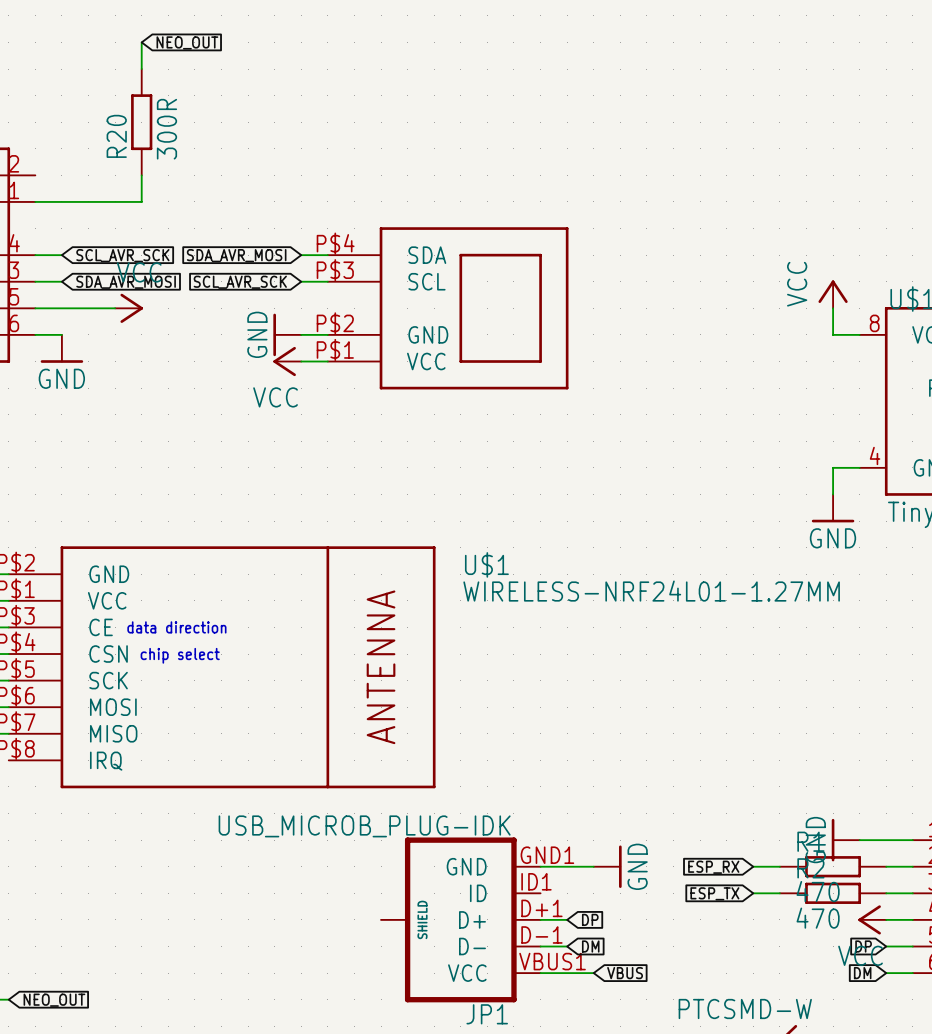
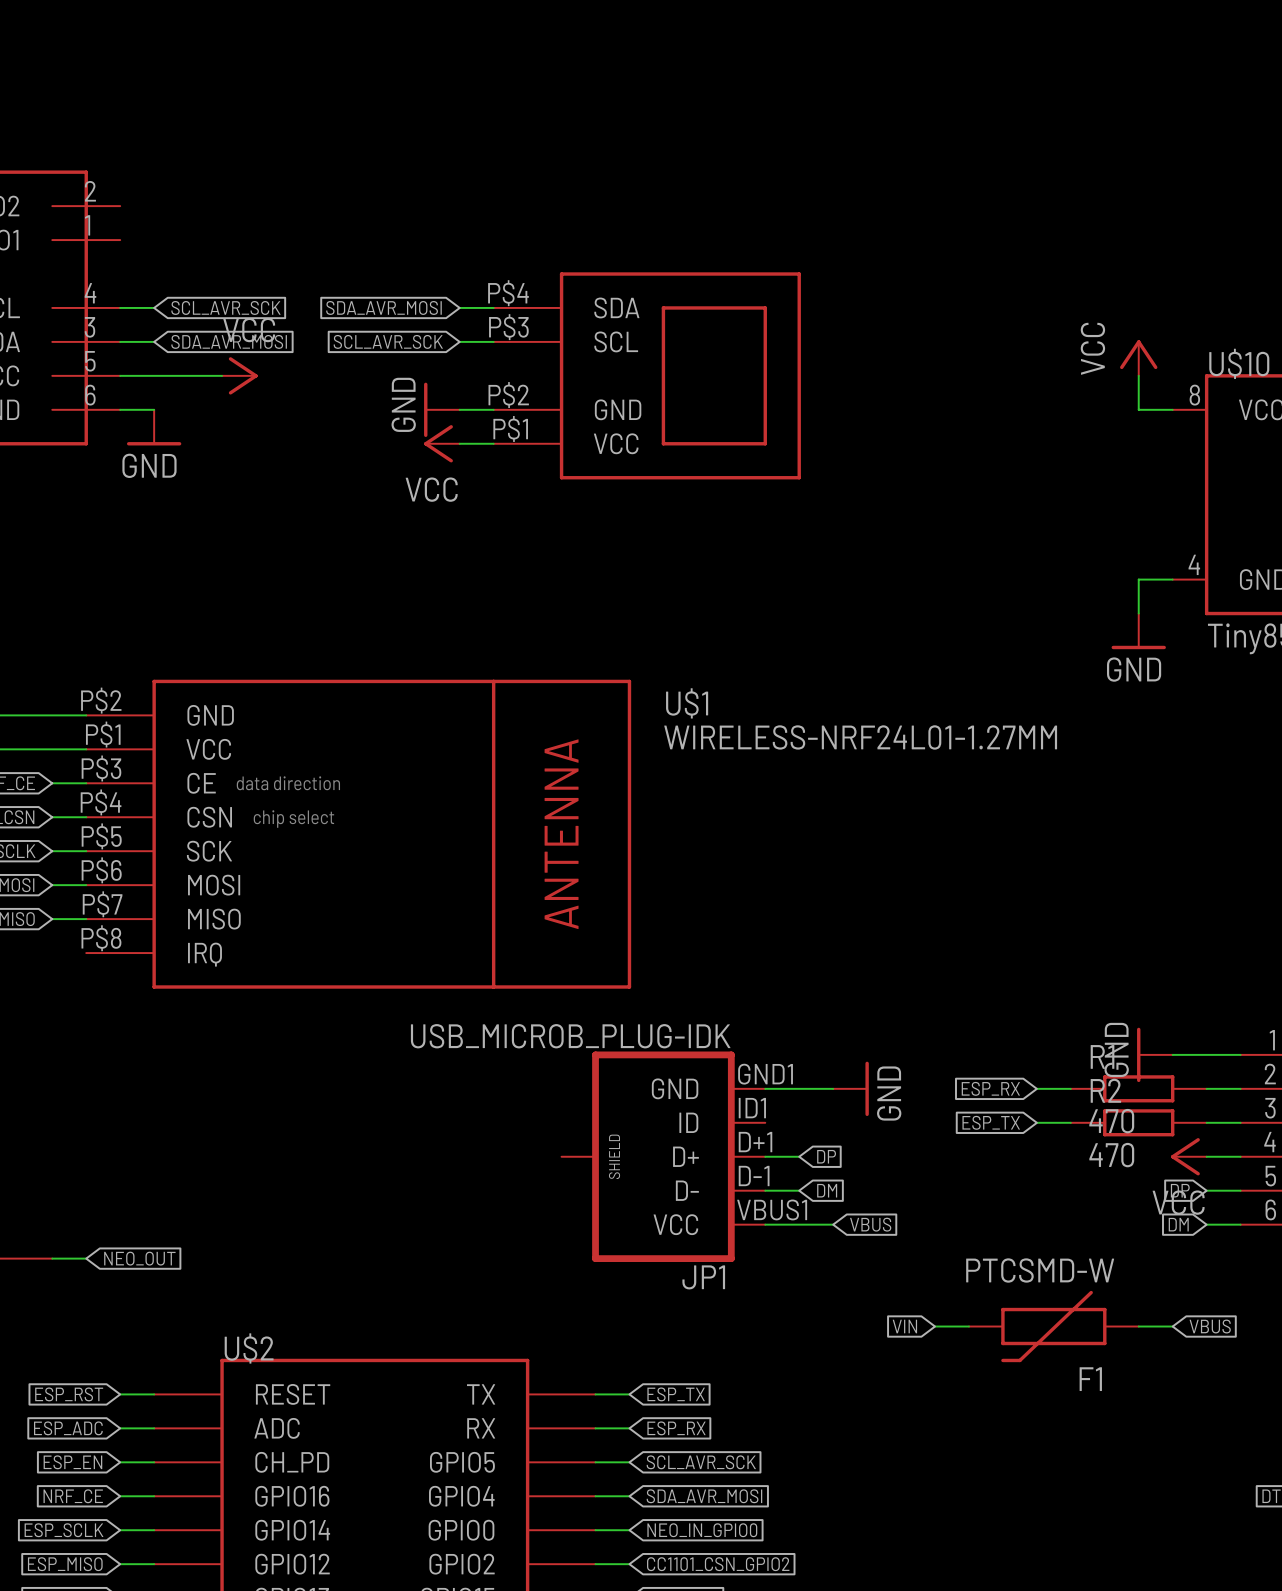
wire: (141, 42) (141, 69) -> none
global label: NEO_OUT (187, 42) -> none
R20: 300R (141, 122) -> none
wire: (141, 175) (141, 201) (35, 201) -> none

